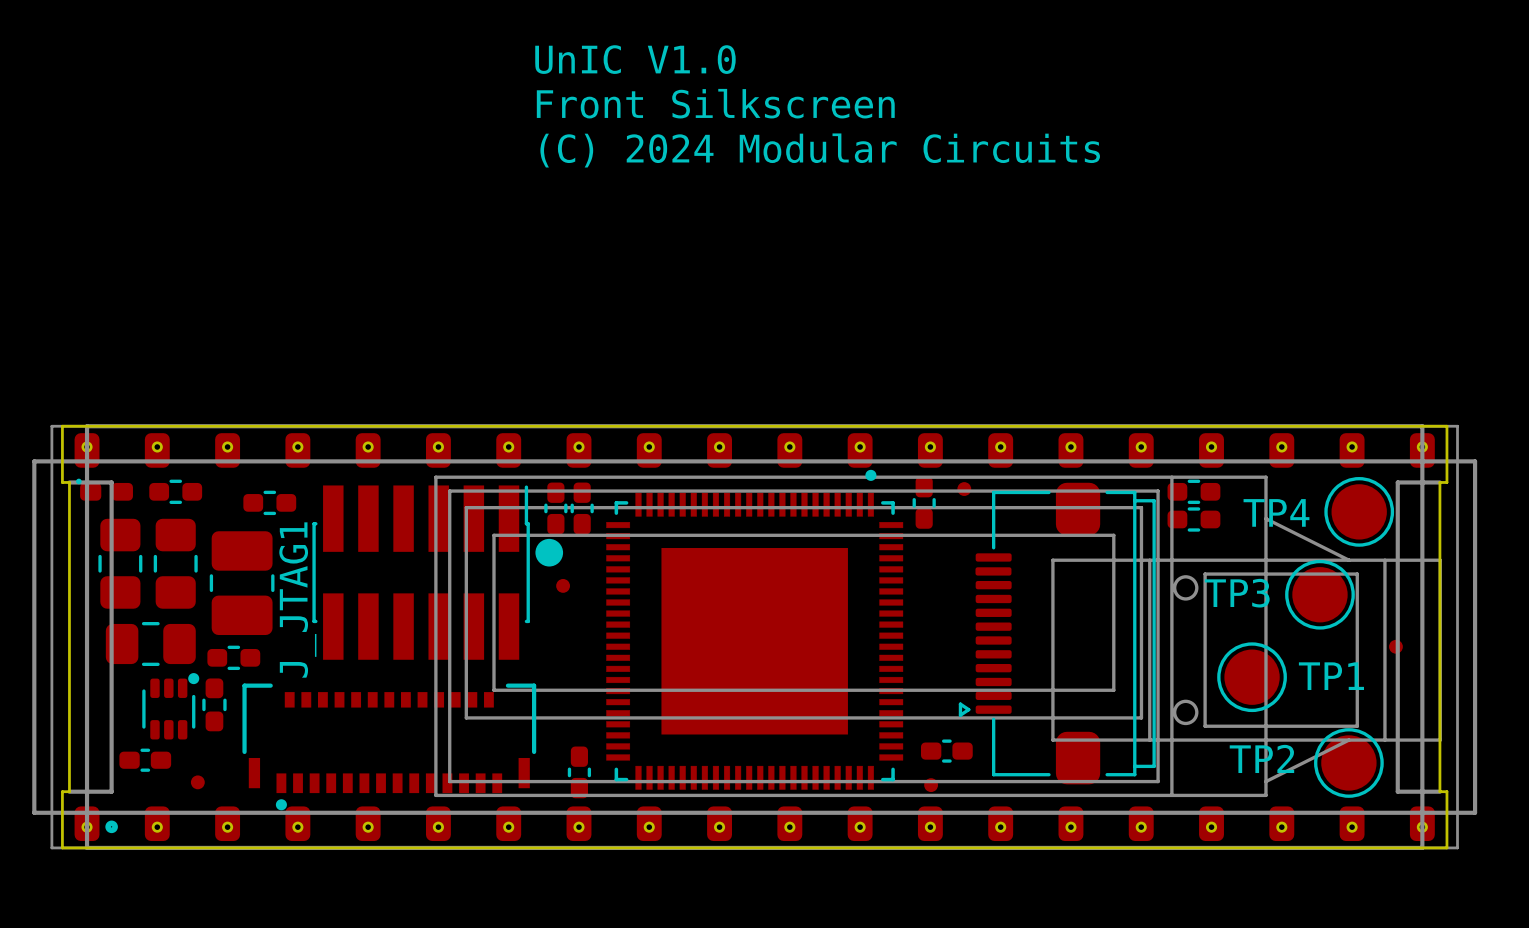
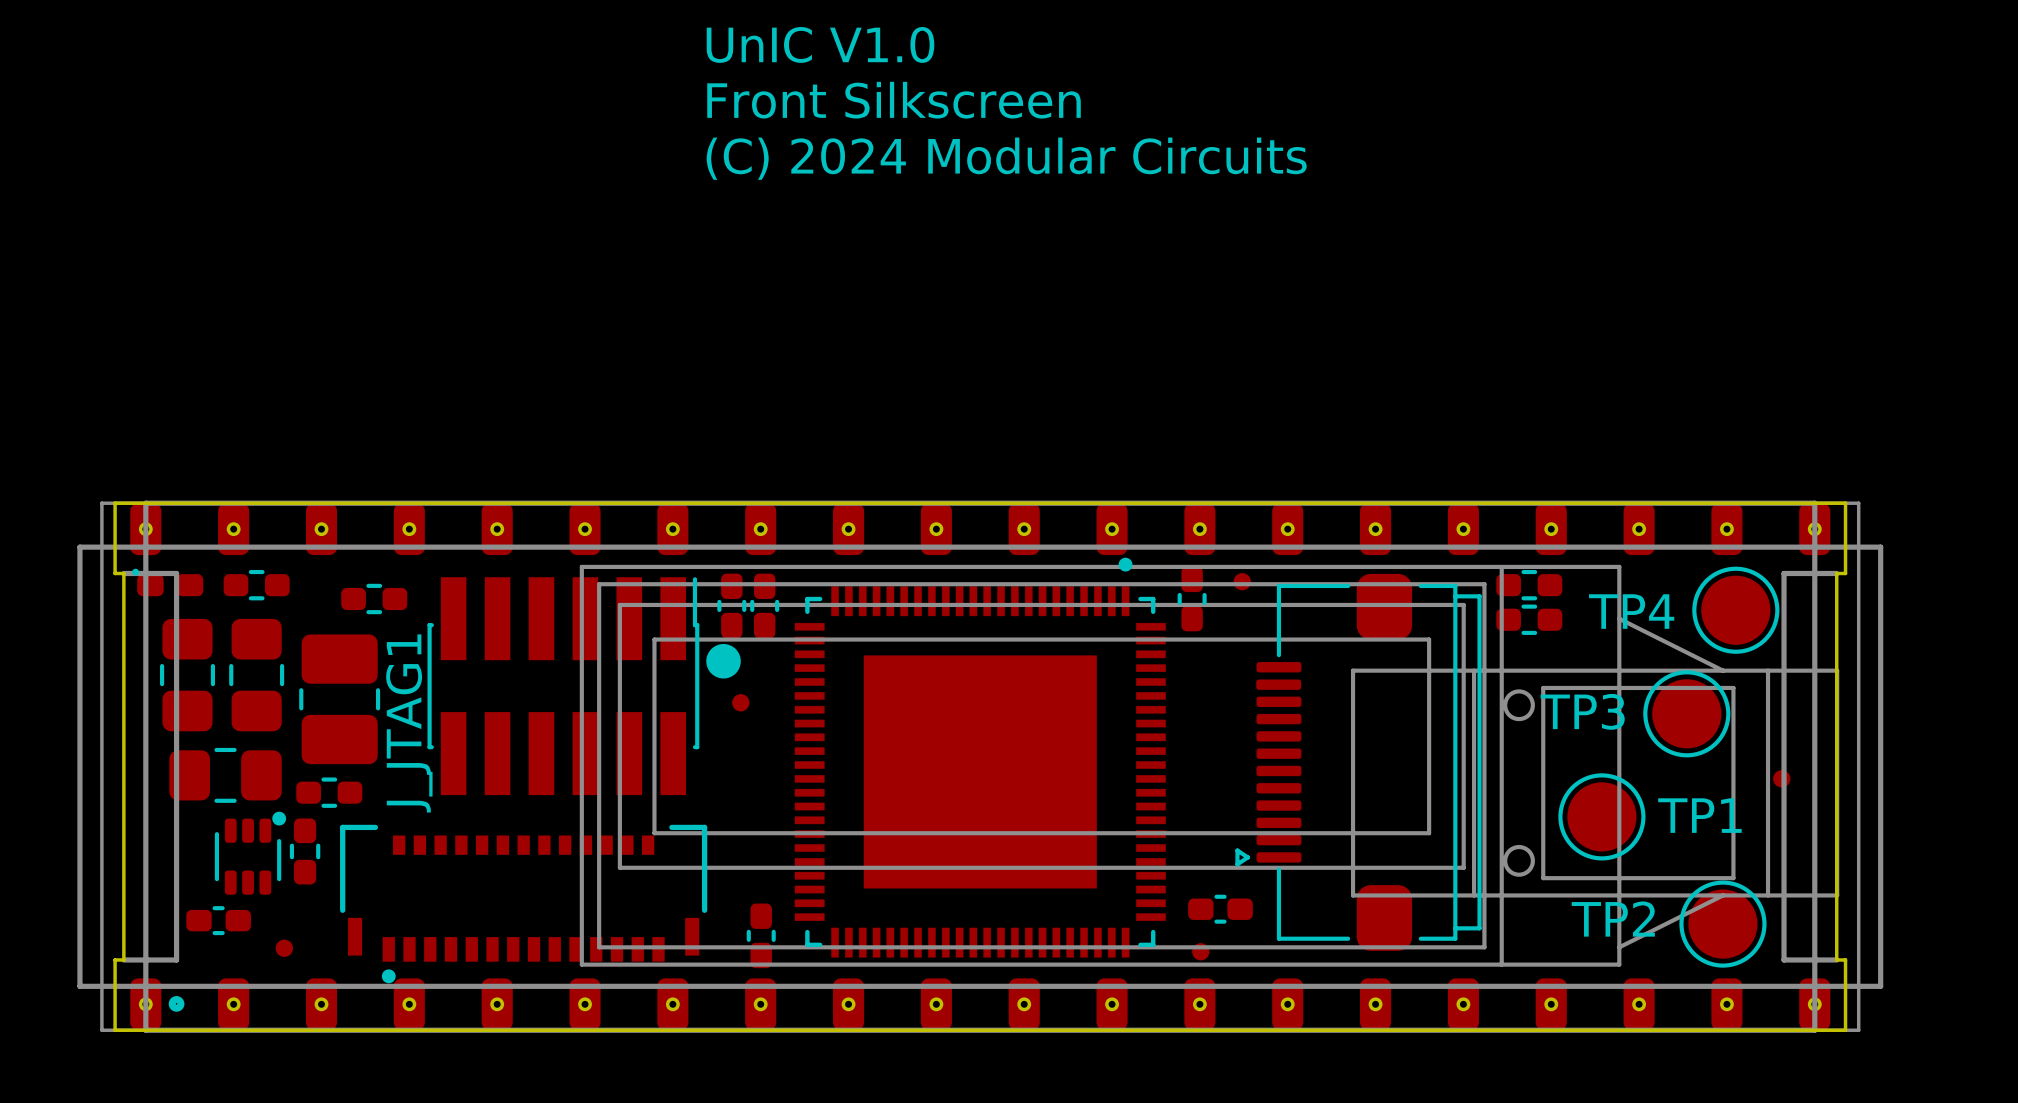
part footprint: [50, 424, 1459, 850] -> [100, 501, 1861, 1032]

